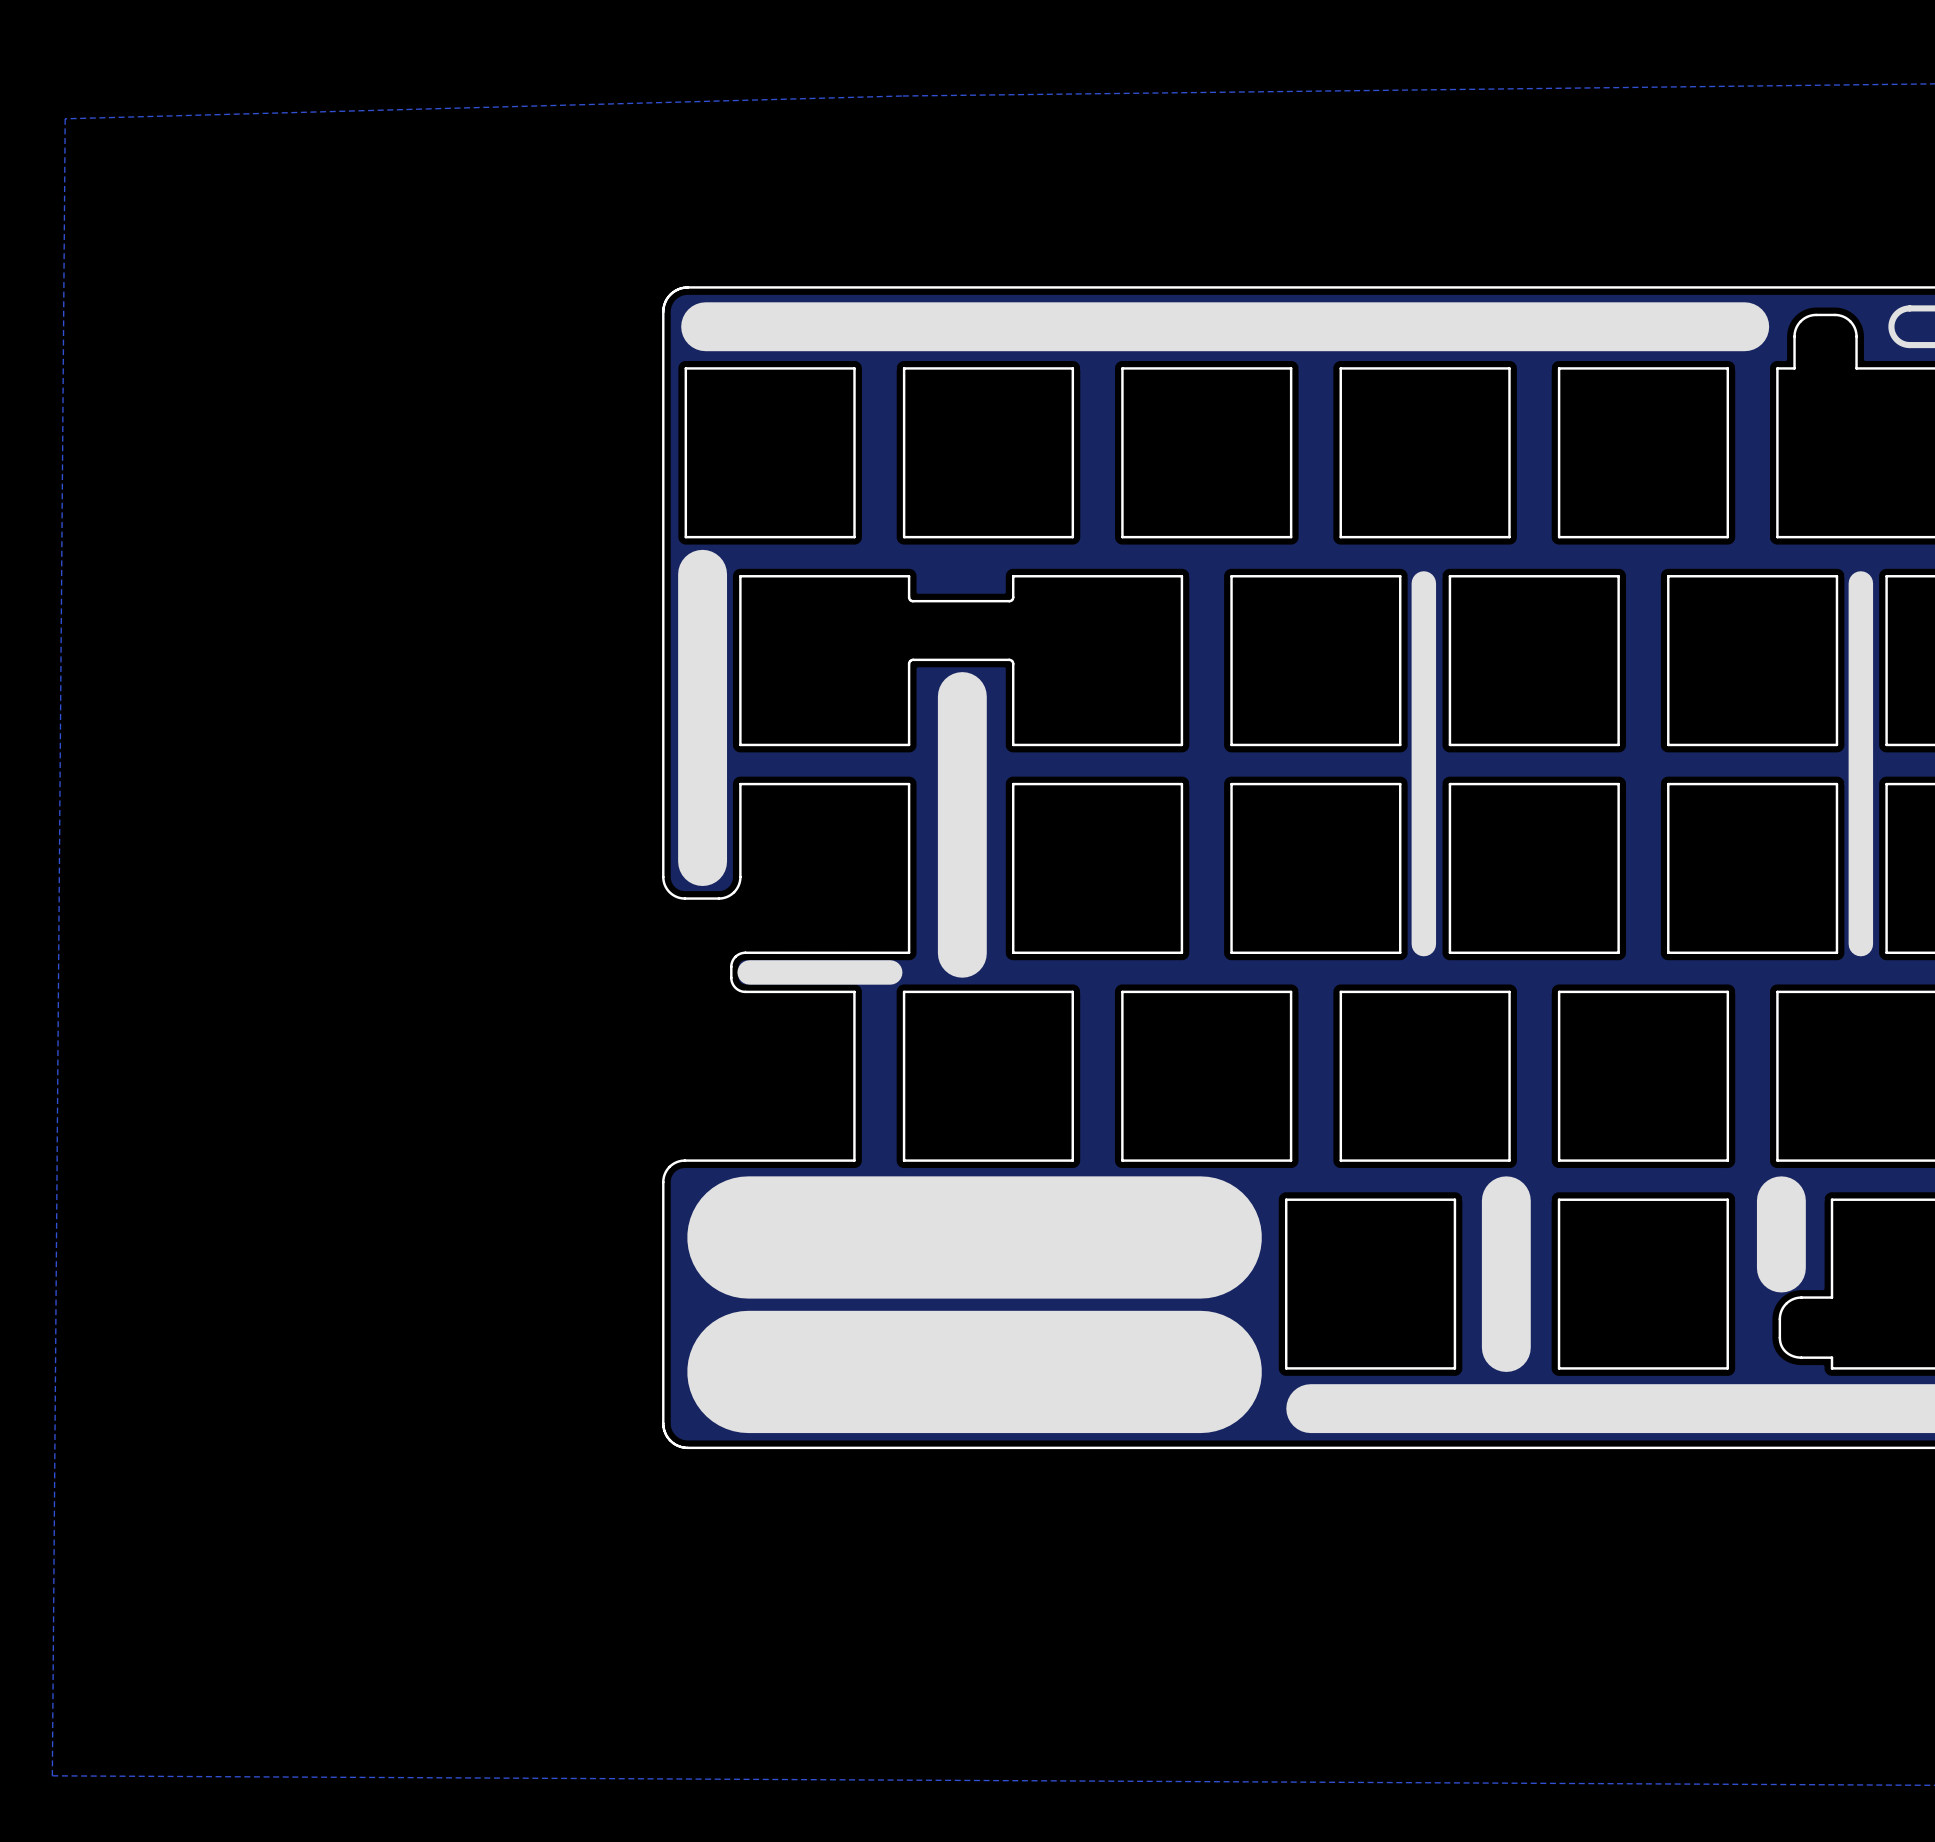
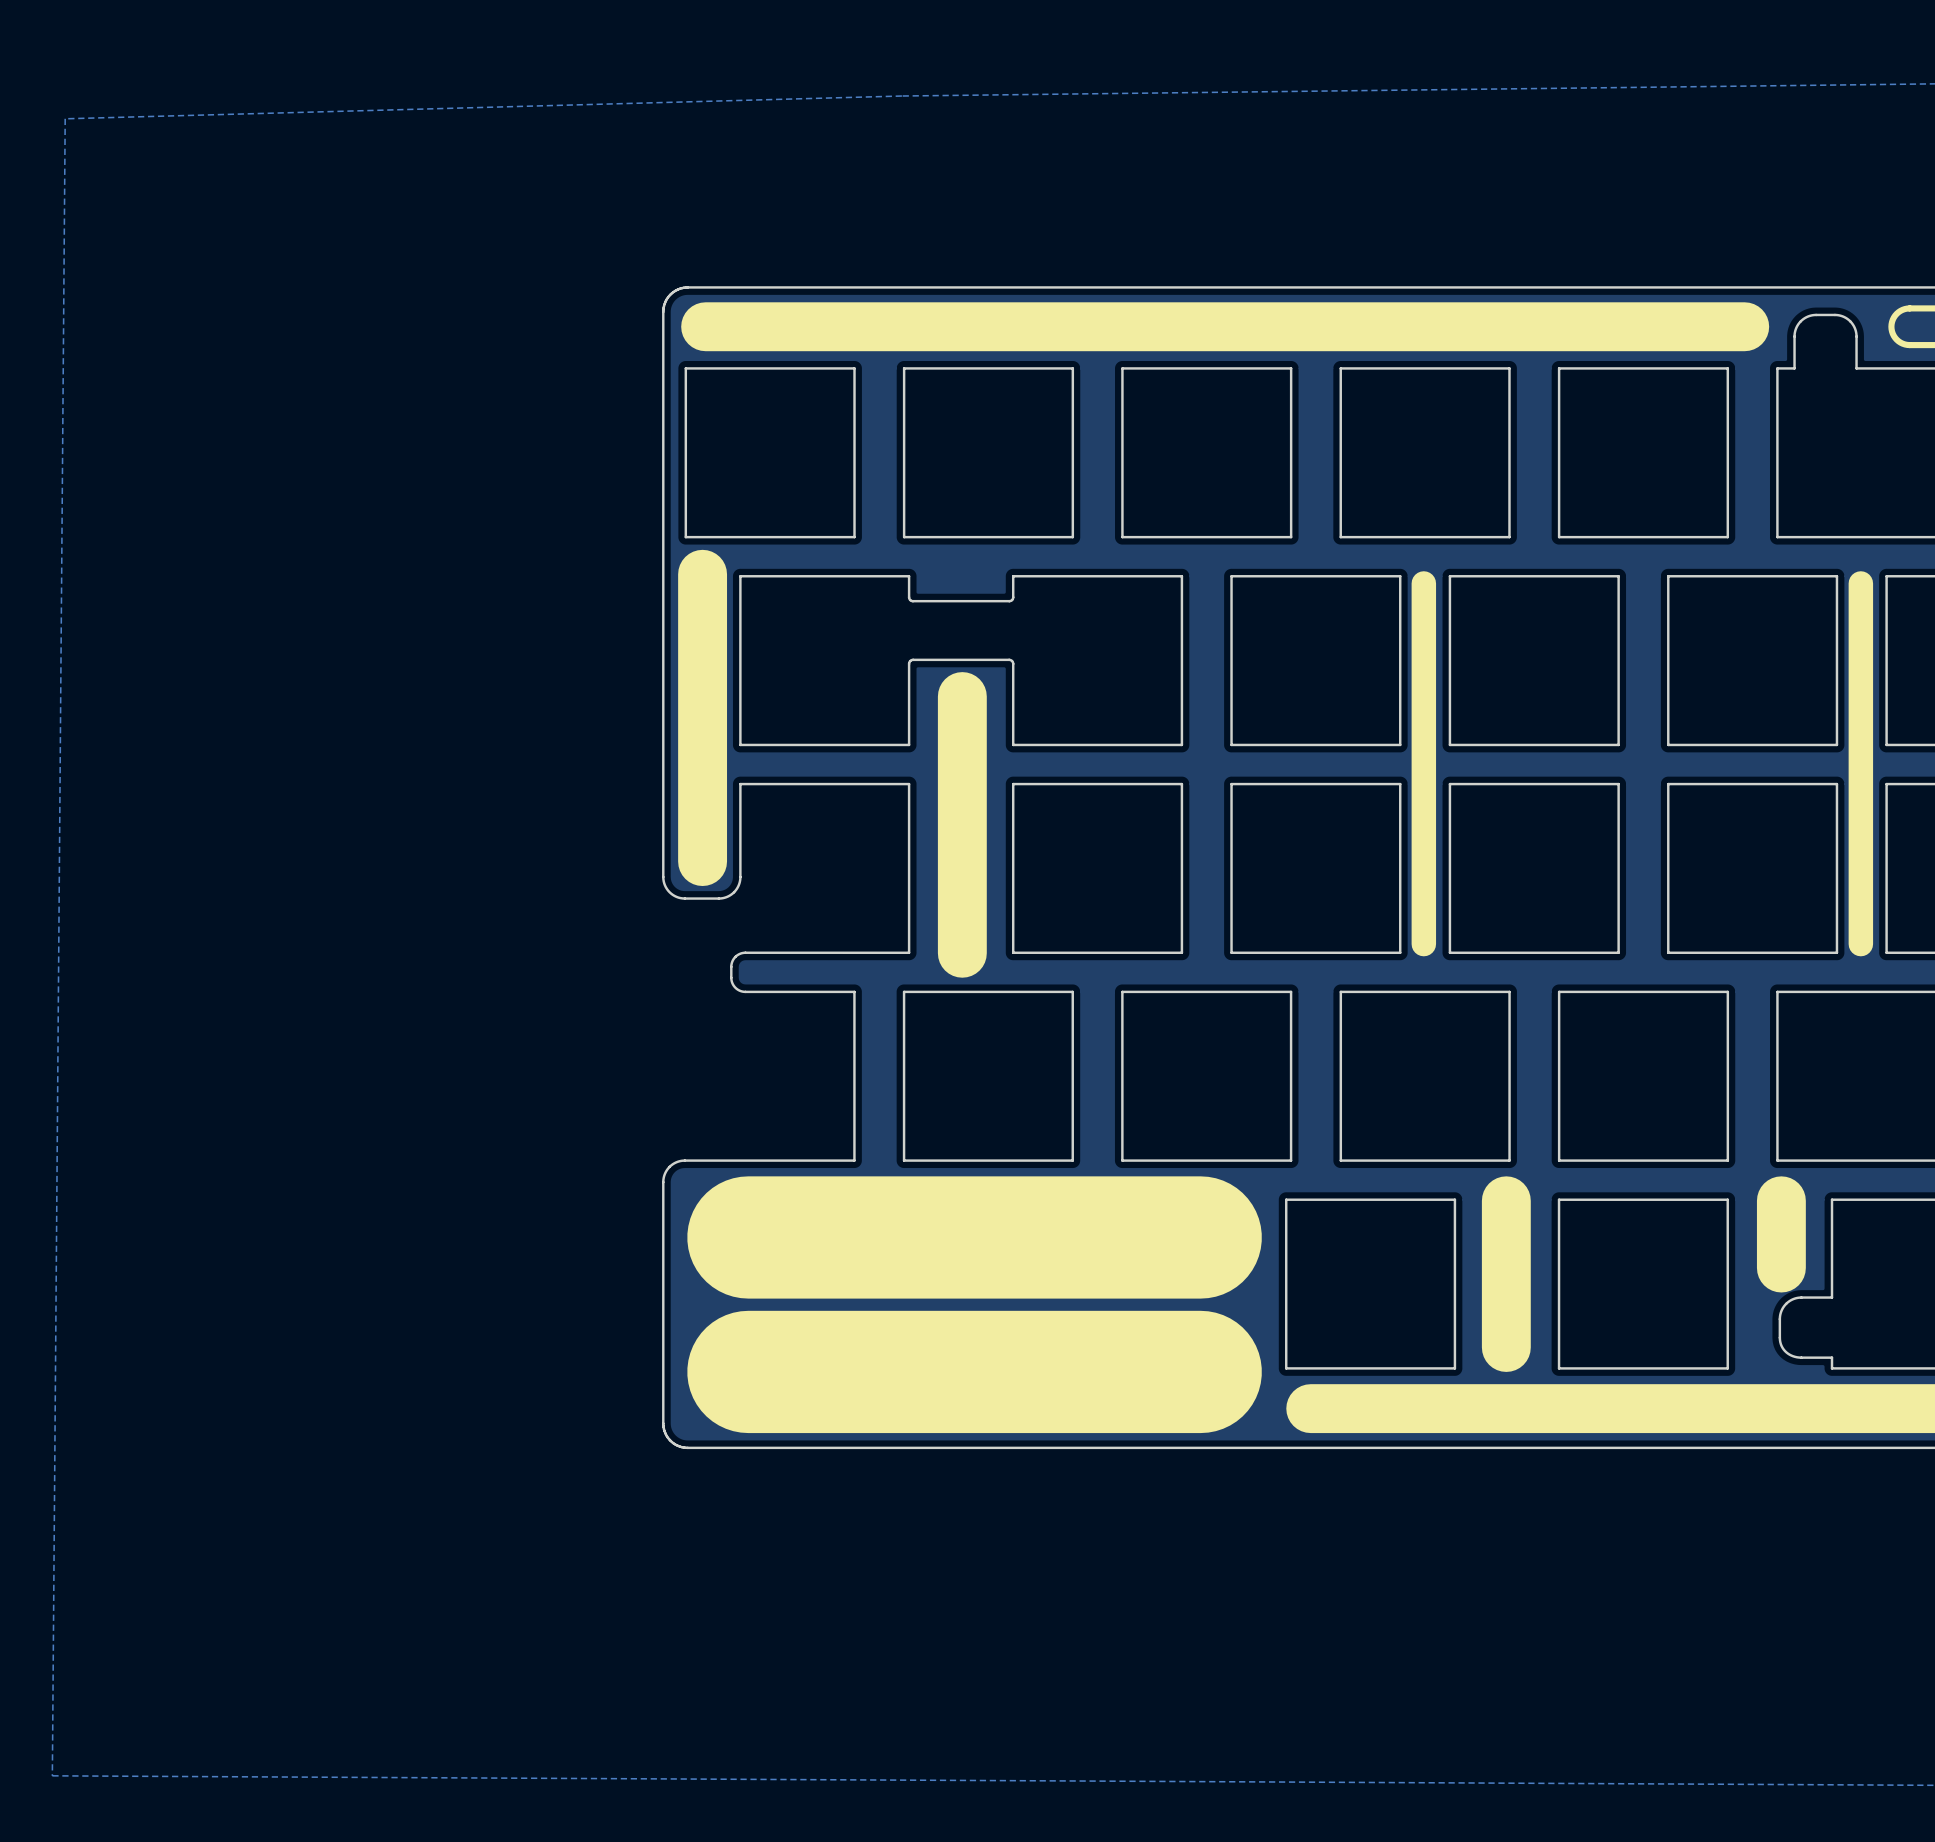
line: (890, 972) (749, 972) -> none

